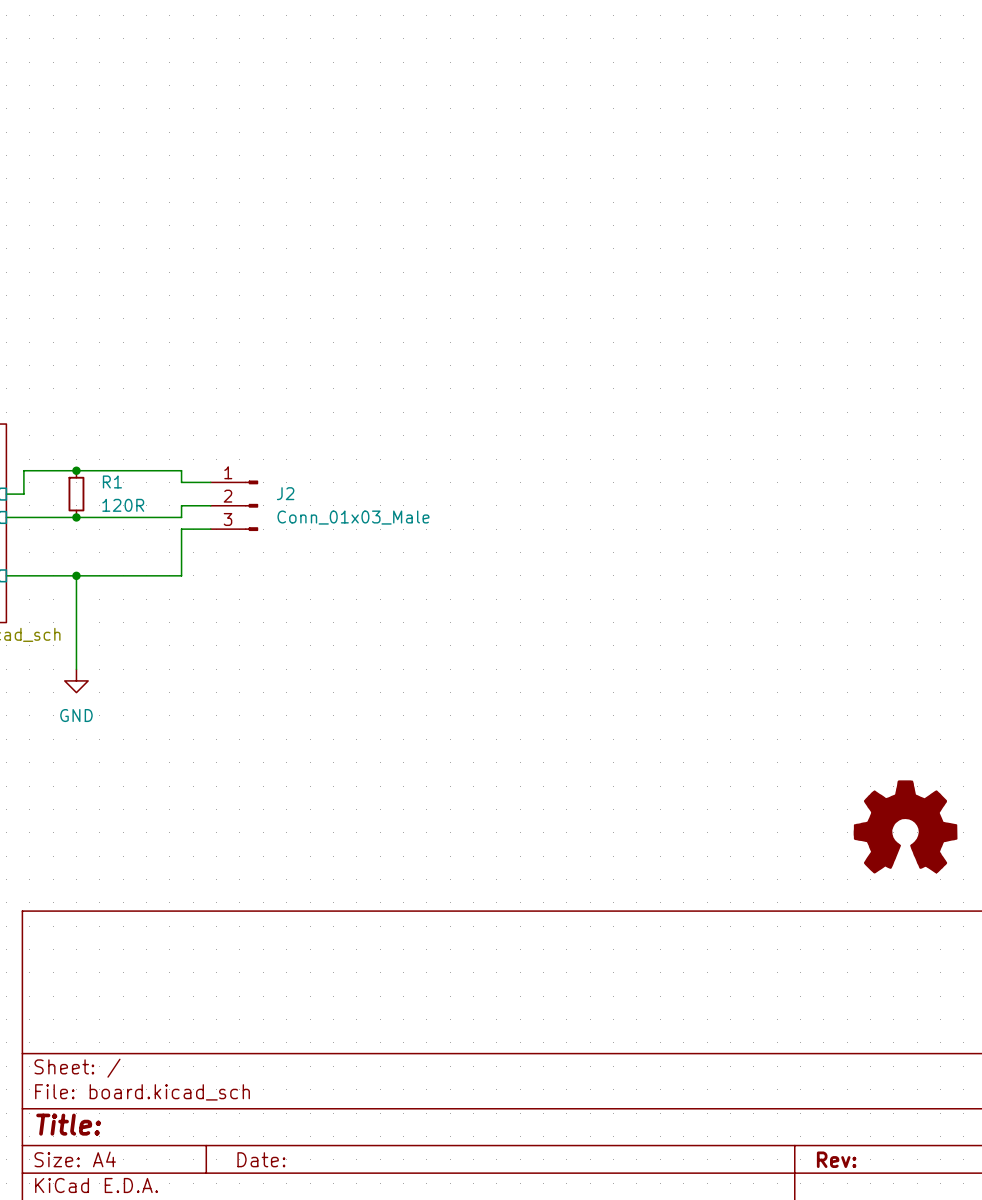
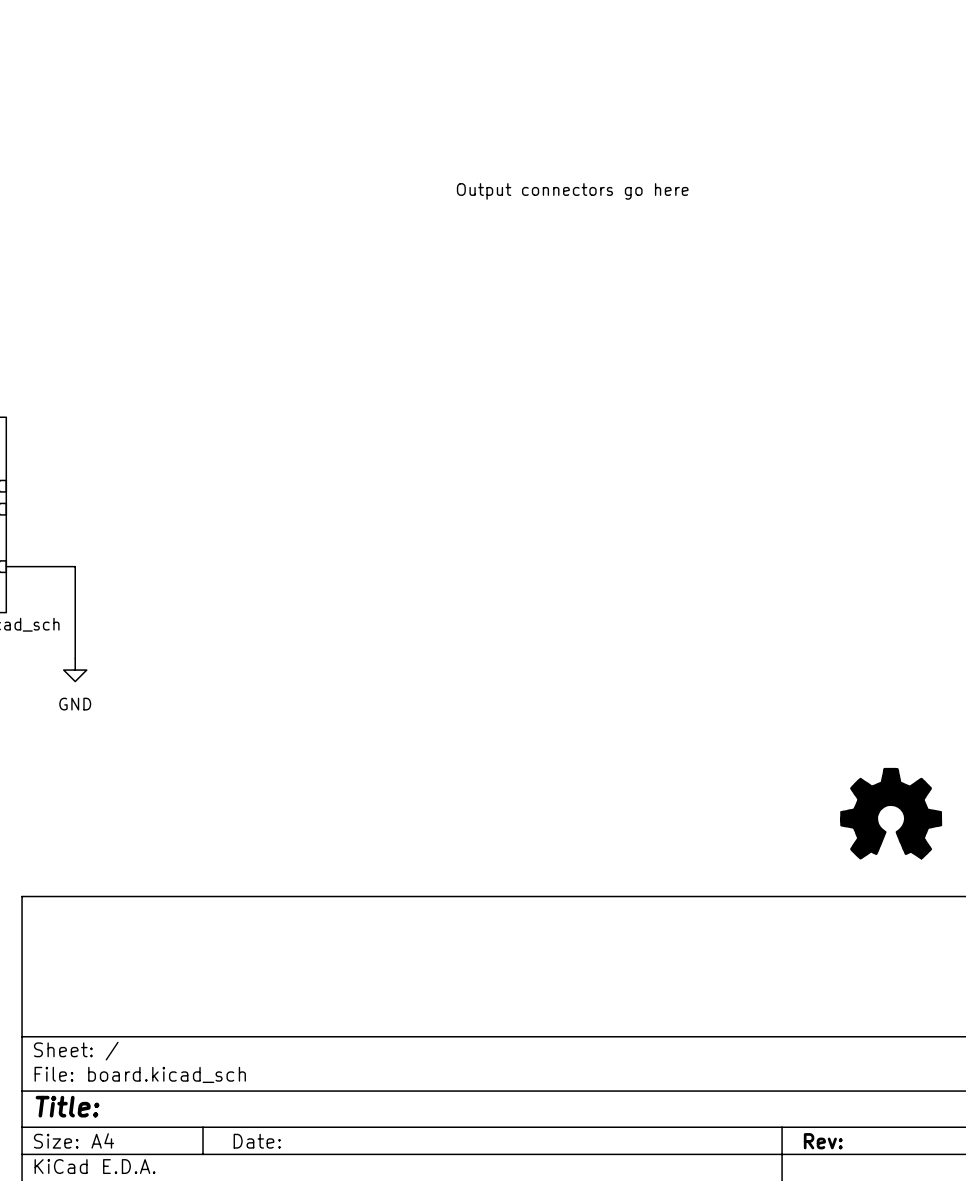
text: none -> Output connectors go here (572, 191)
junction: (76, 470) -> none
wire: (210, 482) (181, 482) (181, 470) (23, 470) (23, 494) (6, 494) -> none
R1: 120R (76, 494) -> none
wire: (210, 505) (181, 505) (181, 517) (6, 517) -> none
J2: Conn_01x03_Male (234, 505) -> none
junction: (76, 517) -> none
wire: (210, 529) (181, 529) (181, 575) (76, 575) -> none
junction: (76, 575) -> none

